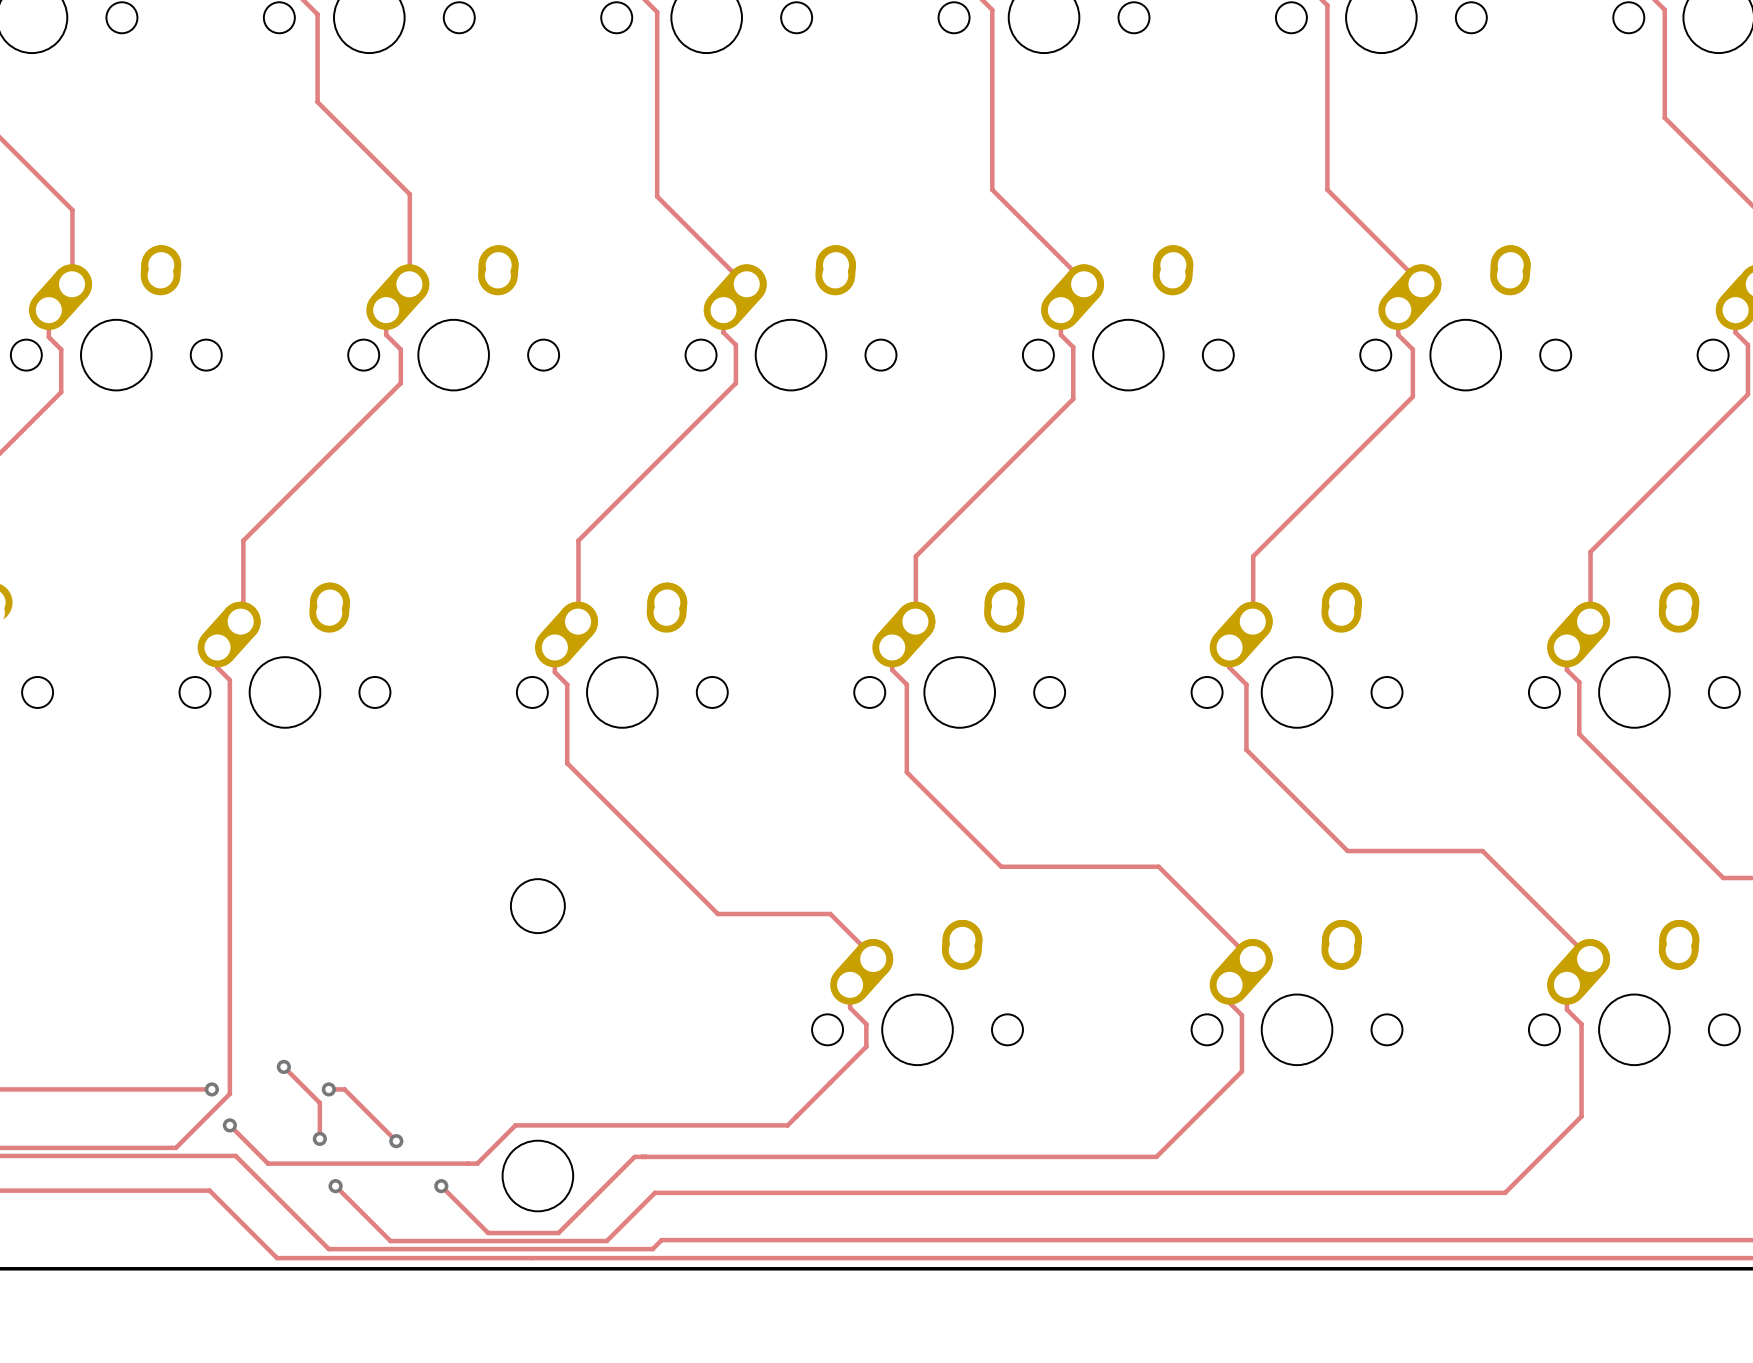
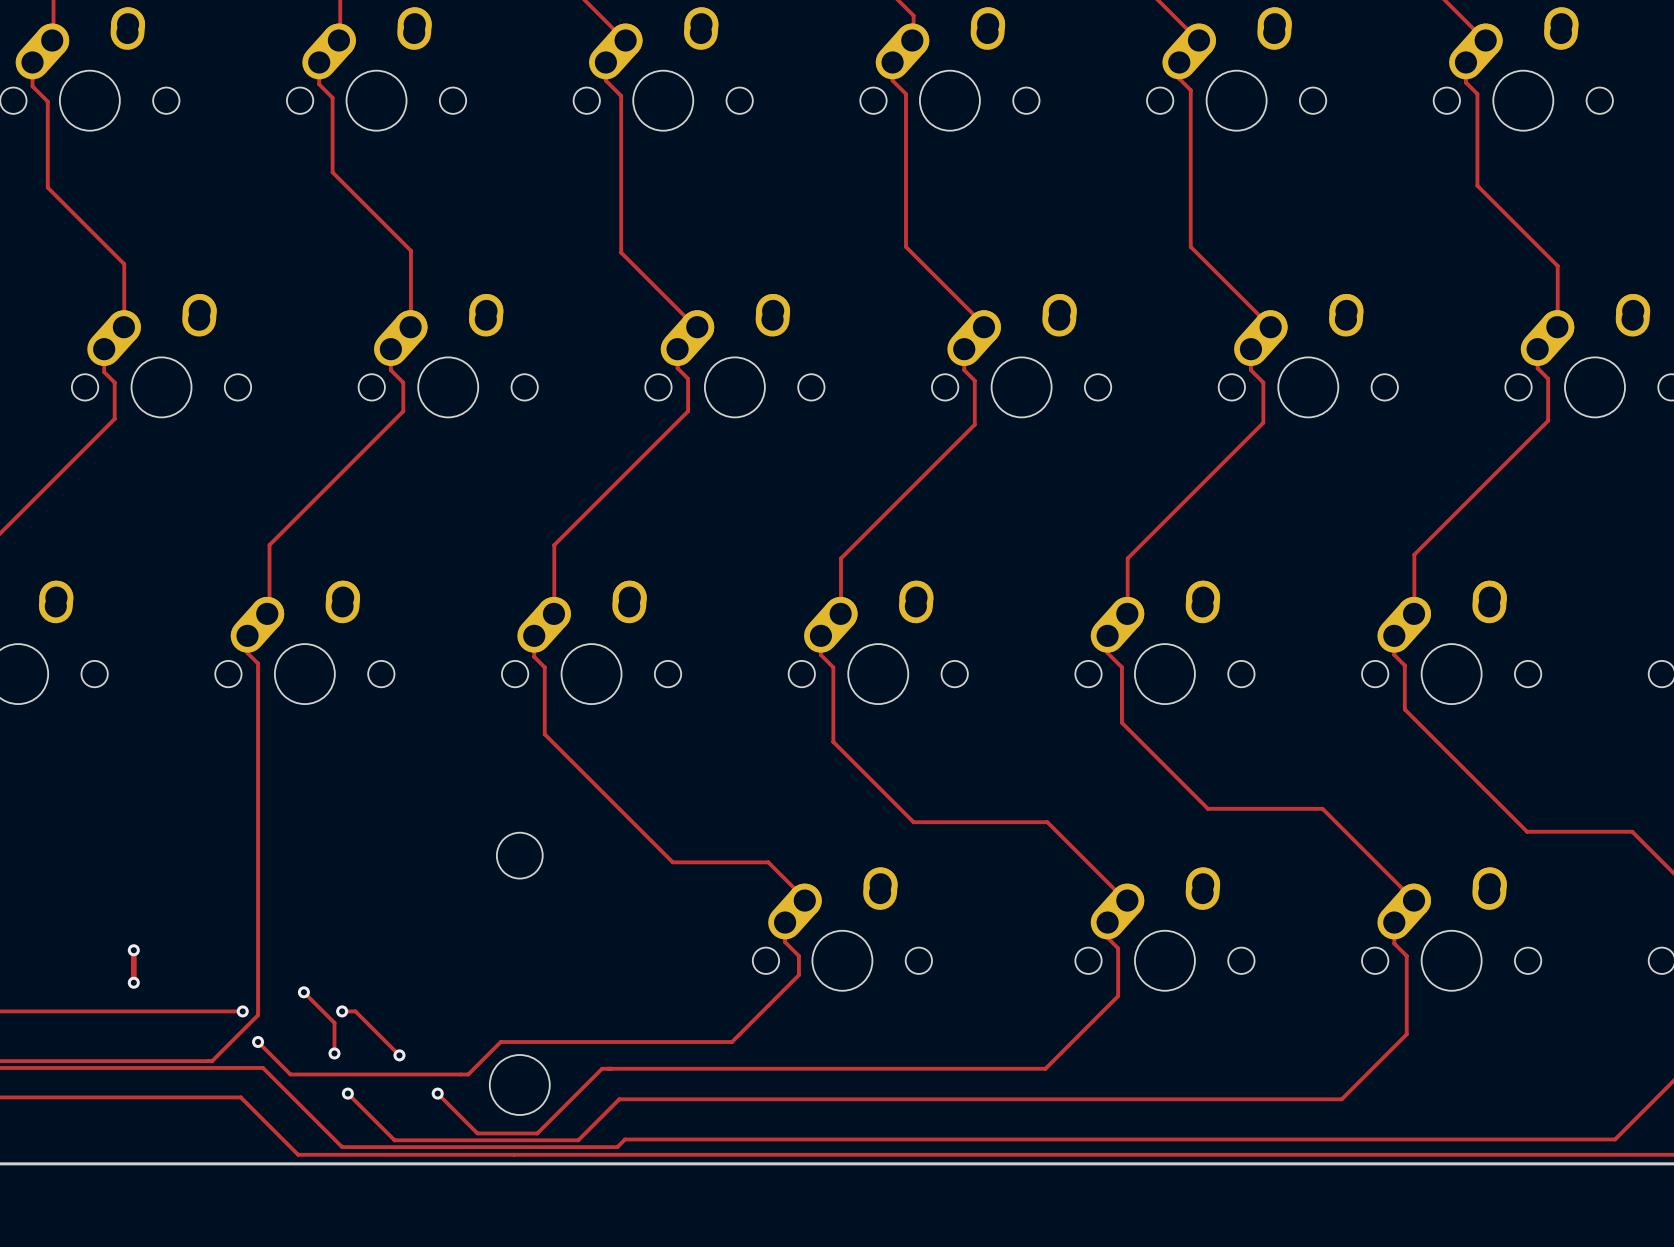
track: none -> (133, 950) (133, 982)
via: none -> (133, 950)
via: none -> (133, 982)

